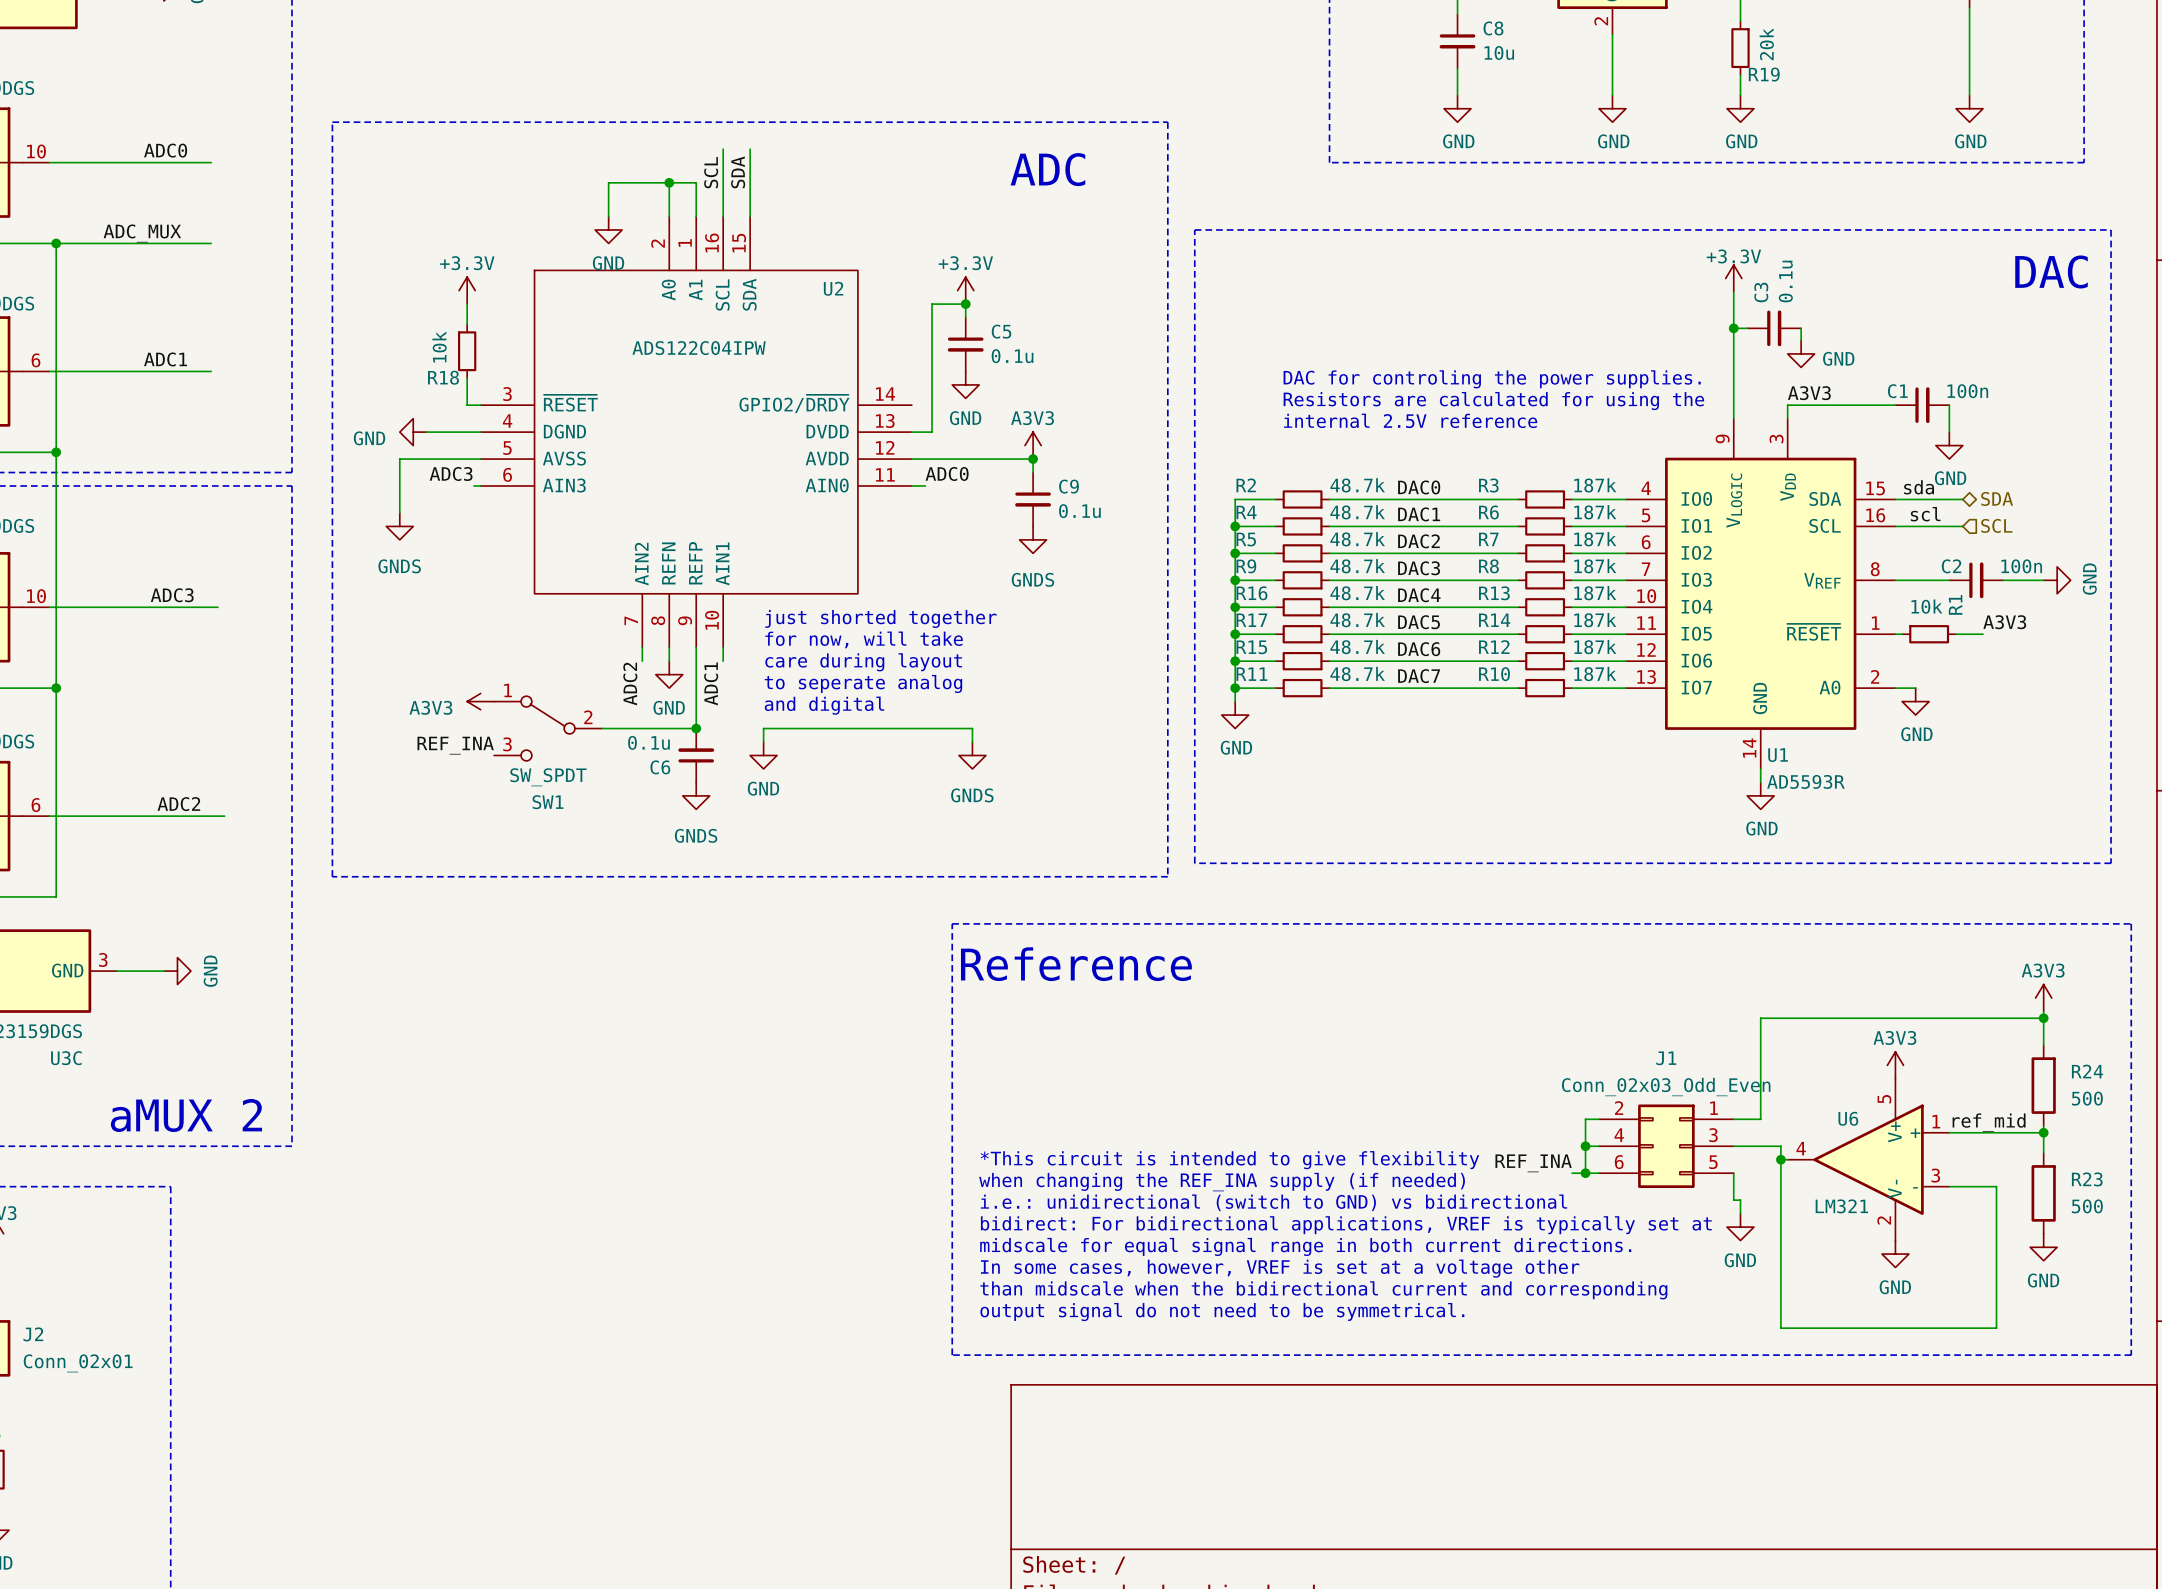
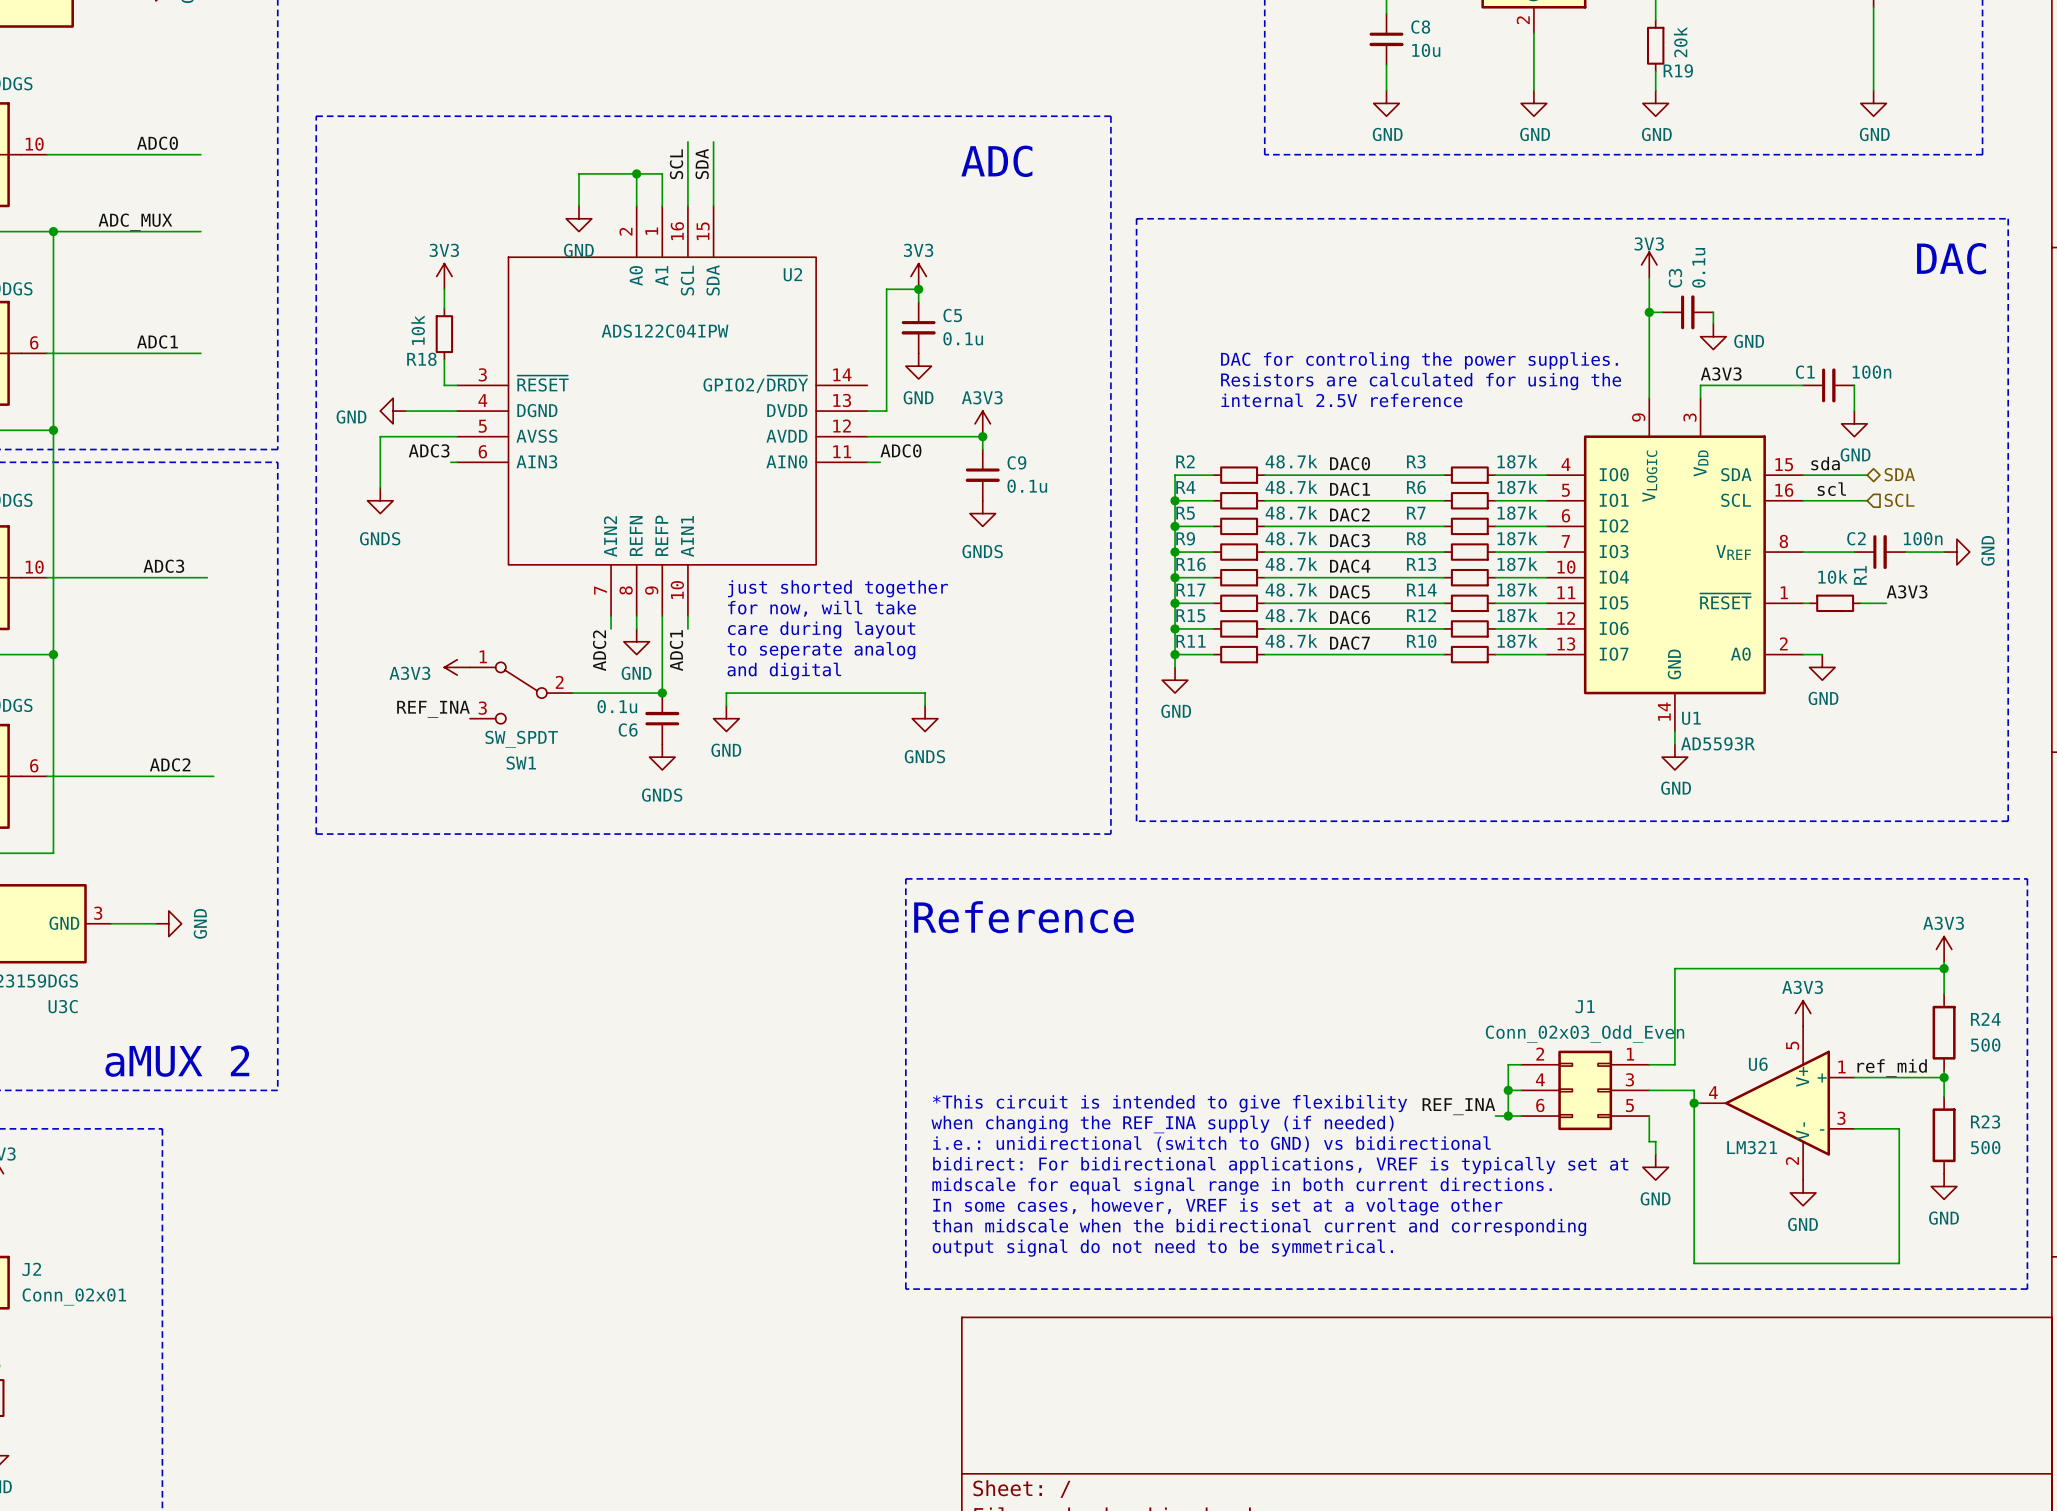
power symbol: +3.3V (1733, 278) -> 3V3 (1649, 264)
power symbol: +3.3V (467, 290) -> 3V3 (444, 276)
power symbol: +3.3V (965, 290) -> 3V3 (918, 276)

